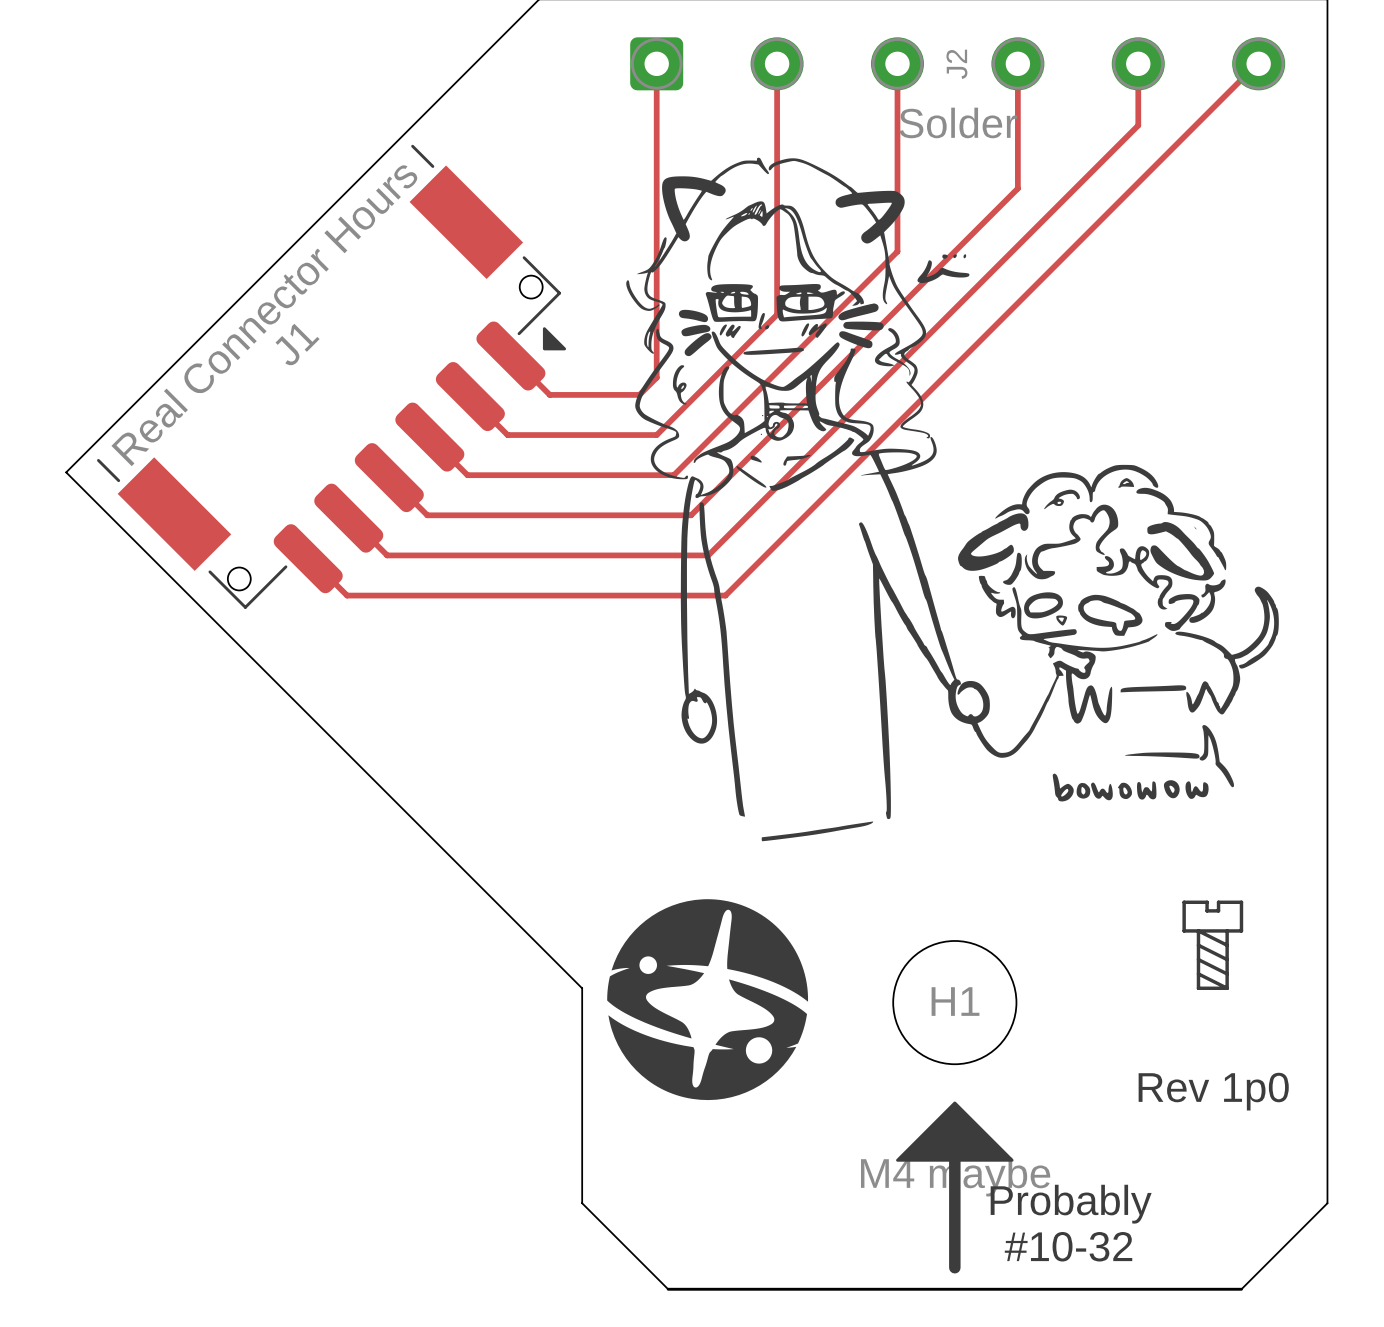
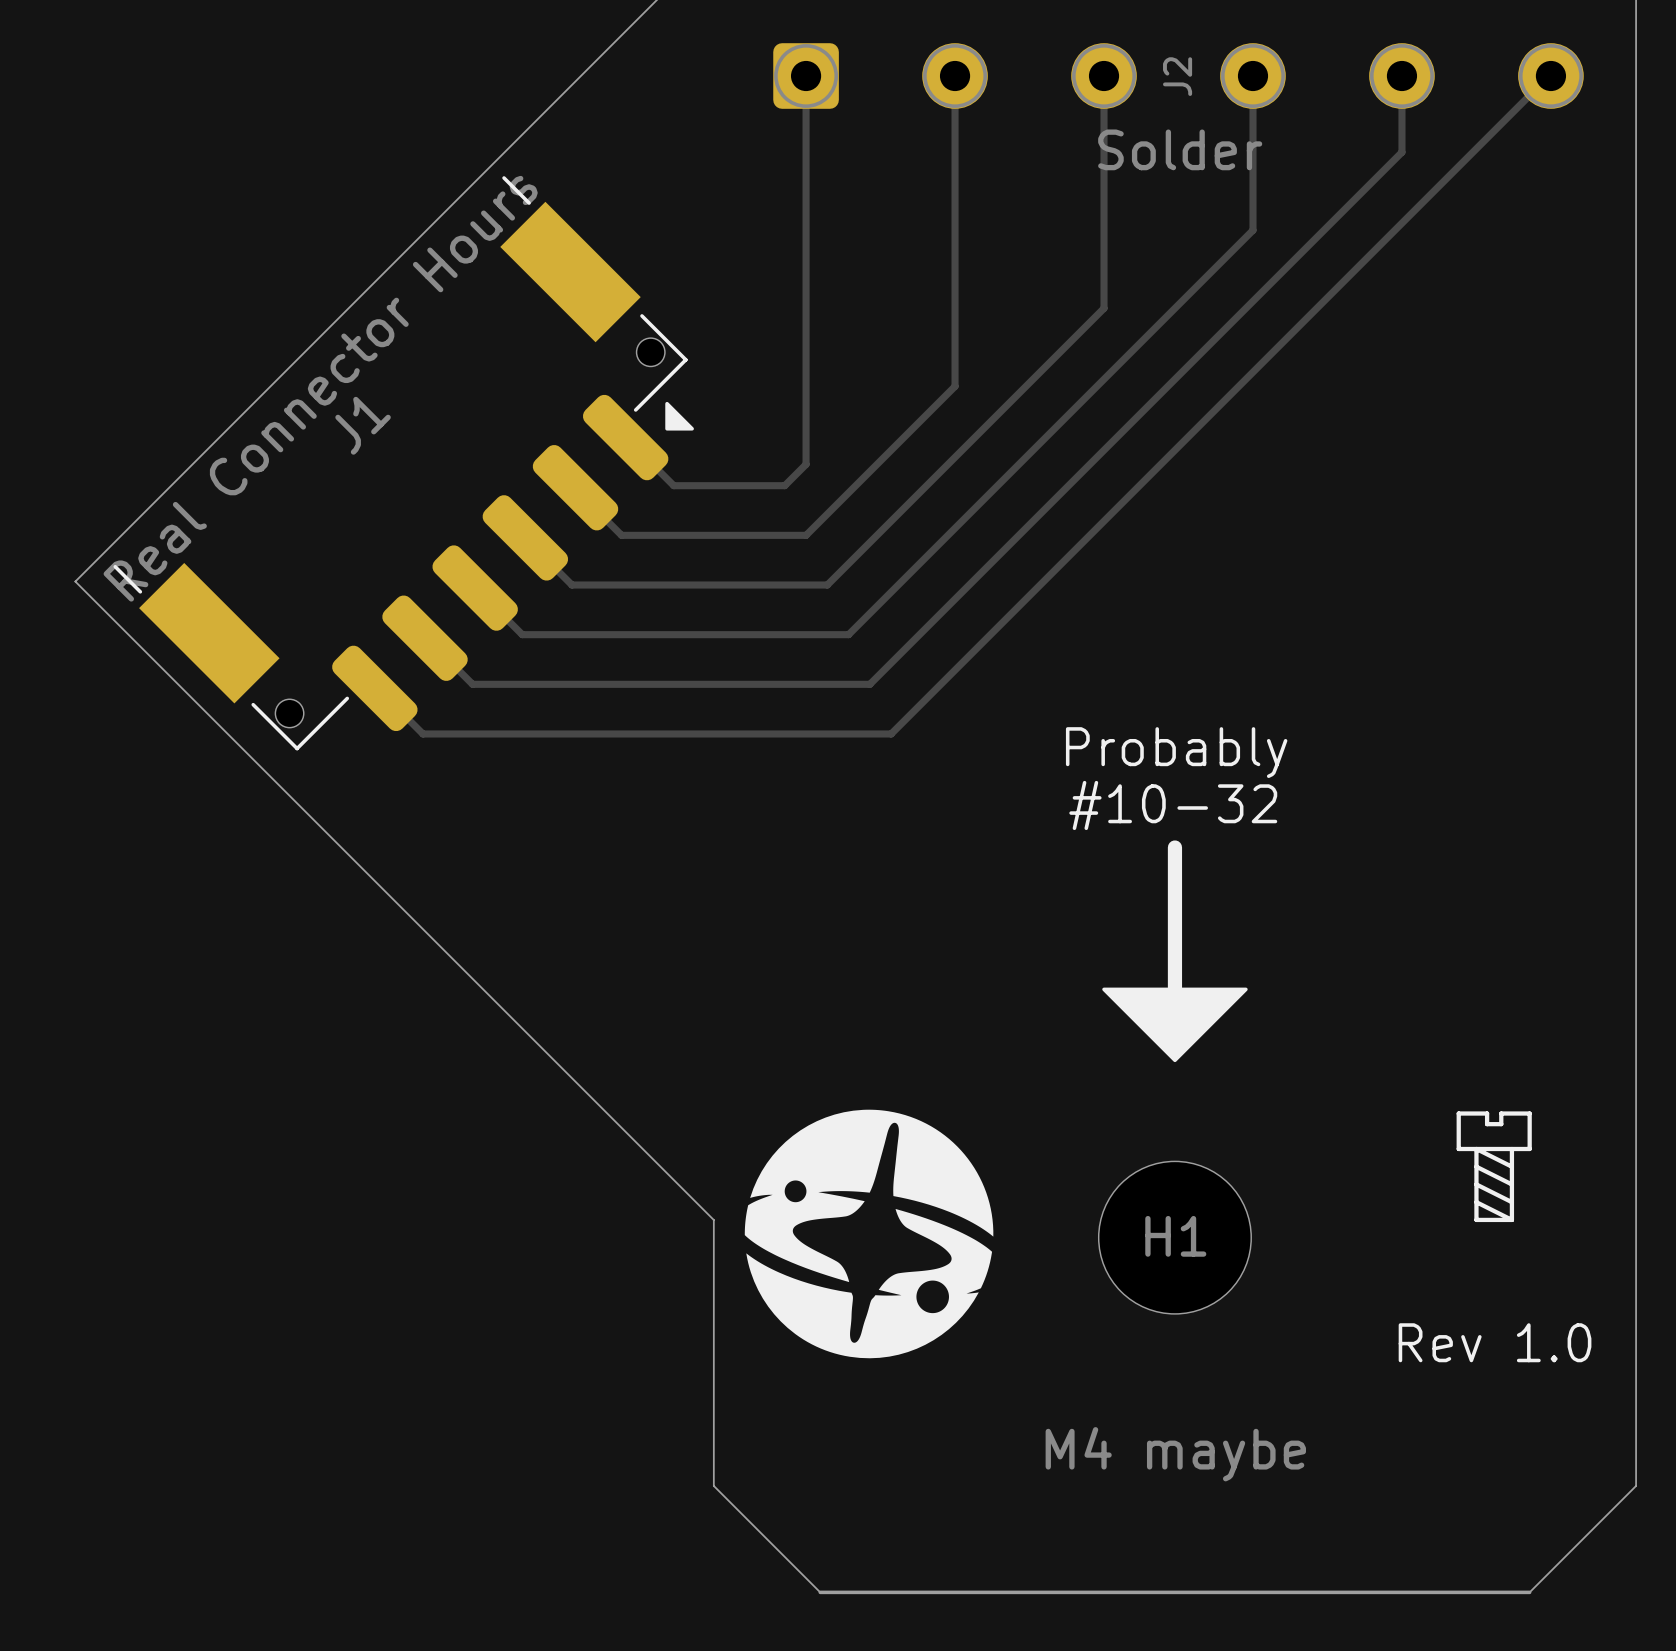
drawing: [626, 157, 1279, 842] -> none
line: none -> (1174, 847) (1174, 1024)
drawing: none -> [1102, 987, 1248, 1063]
text: Rev 1p0 (1213, 1091) -> Rev 1.0 (1495, 1342)
drawing: [896, 1101, 1014, 1162] -> none
line: (954, 1131) (954, 1267) -> none
text position: Probably (1071, 1204) -> Probably (1176, 752)
text position: #10-32 (1068, 1246) -> #10-32 (1173, 805)

